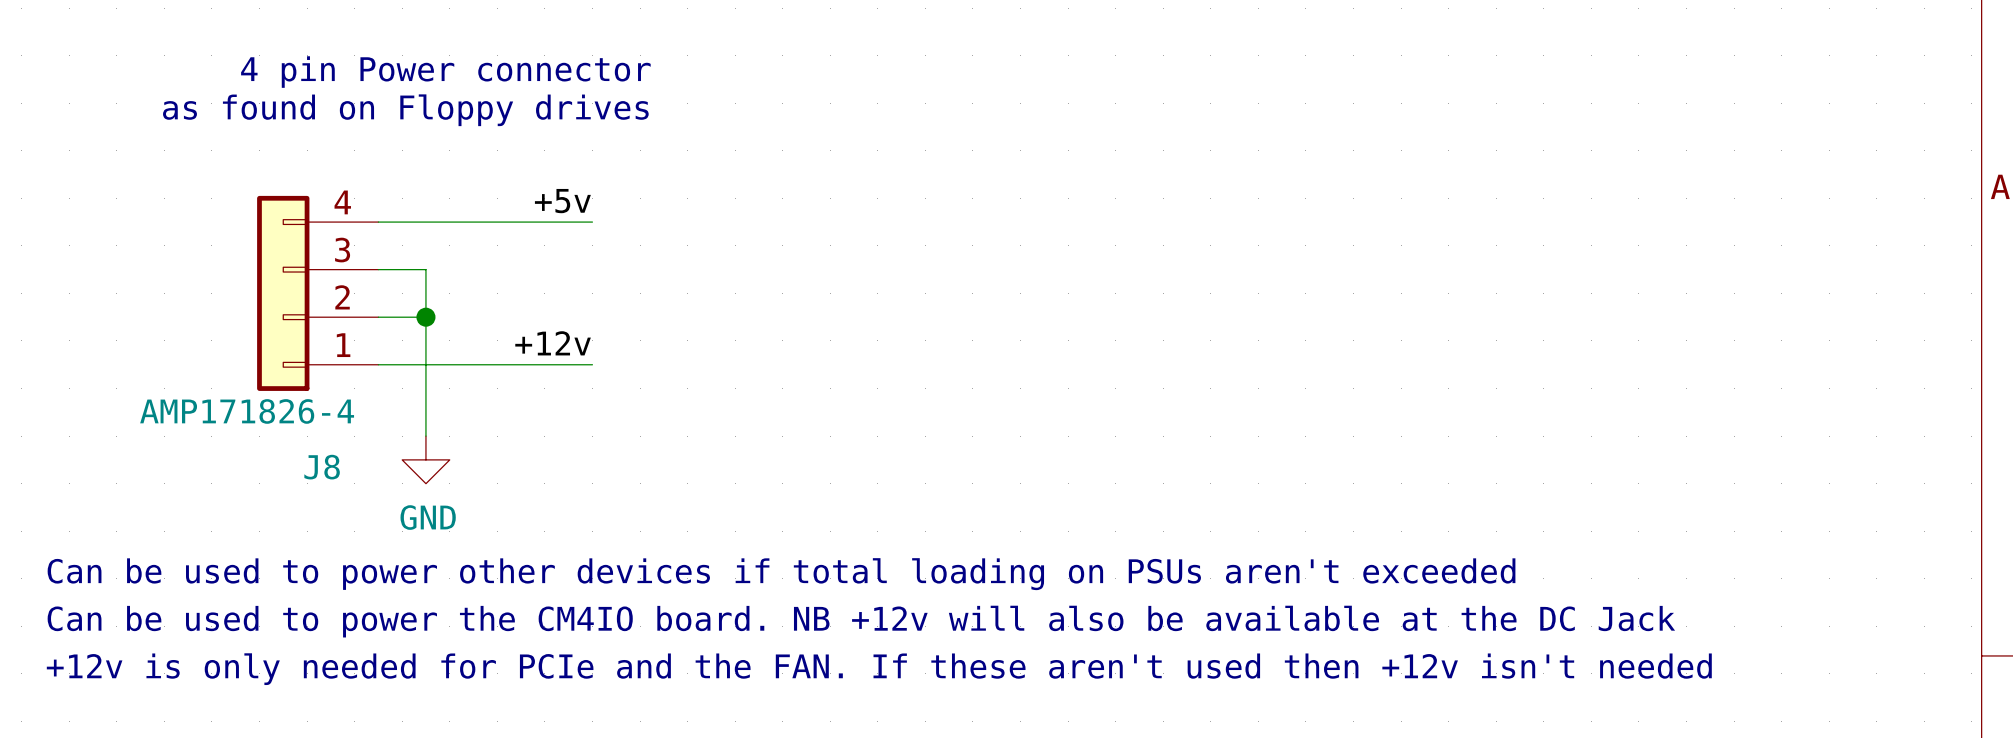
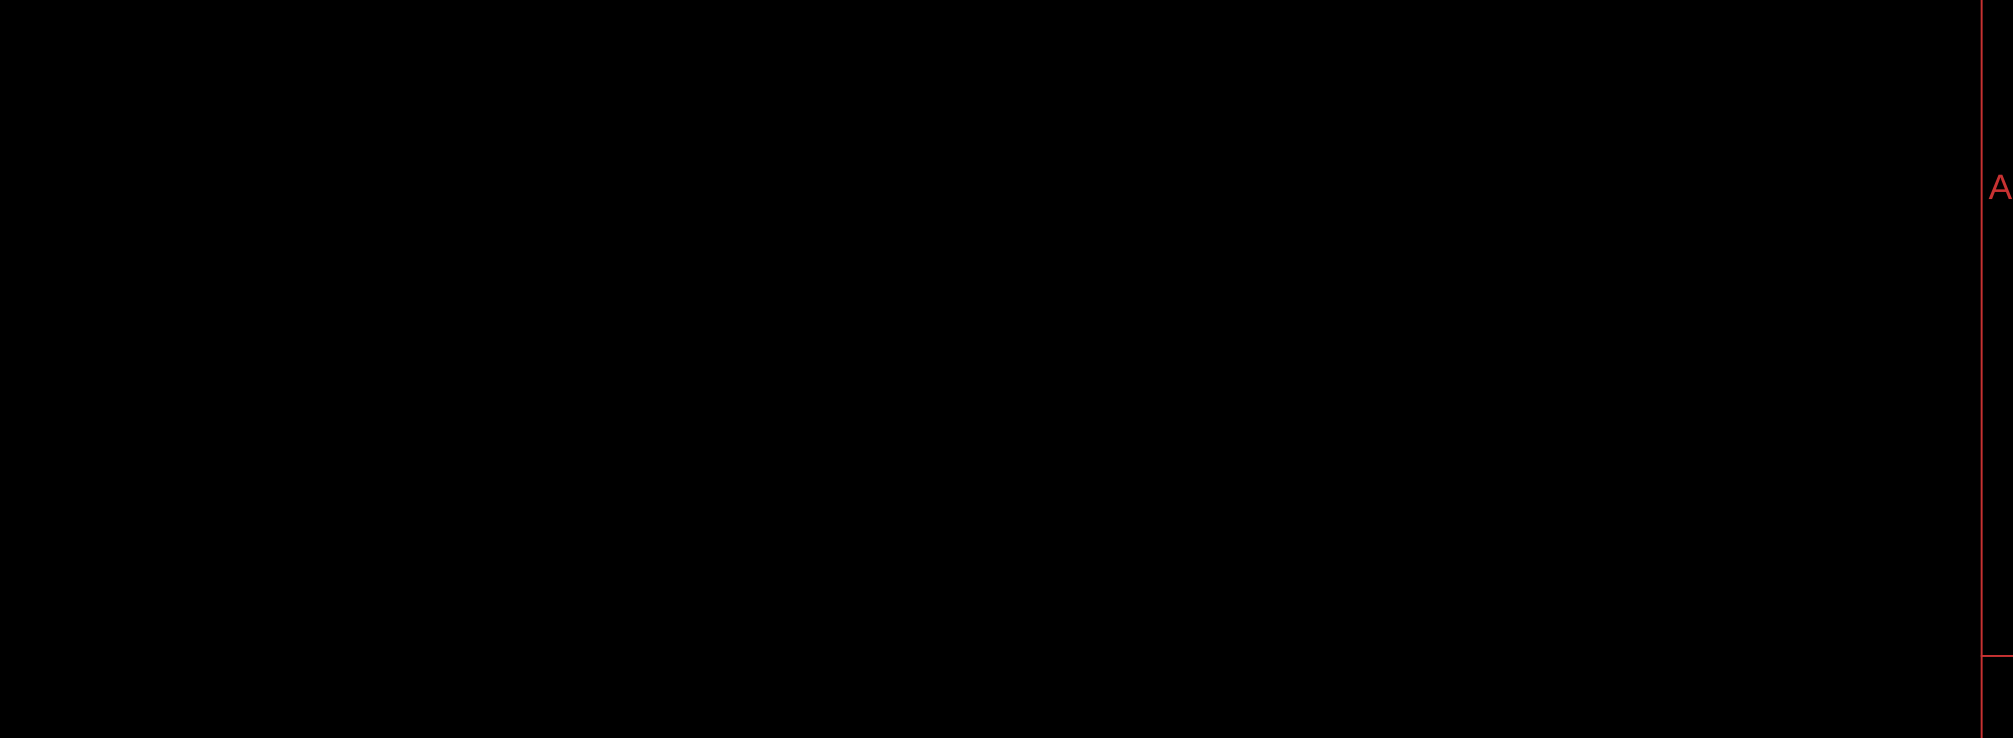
text: 4 pin Power connector (445, 72) -> none
text: as found on Floppy drives (405, 110) -> none
label: +5v (562, 201) -> none
wire: (378, 222) (592, 222) -> none
wire: (378, 269) (425, 269) (425, 436) -> none
J8: AMP171826-4 (317, 293) -> none
wire: (378, 317) (425, 317) -> none
junction: (425, 317) -> none
label: +12v (553, 343) -> none
wire: (378, 364) (592, 364) -> none
power symbol: GND (425, 459) -> none
text: Can be used to power other devices if total loading on PSUs aren't exceeded (781, 574) -> none
text: Can be used to power the CM4IO board. NB +12v will also be available at the DC Jack (861, 621) -> none
text: +12v is only needed for PCIe and the FAN. If these aren't used then +12v isn't needed (879, 669) -> none

